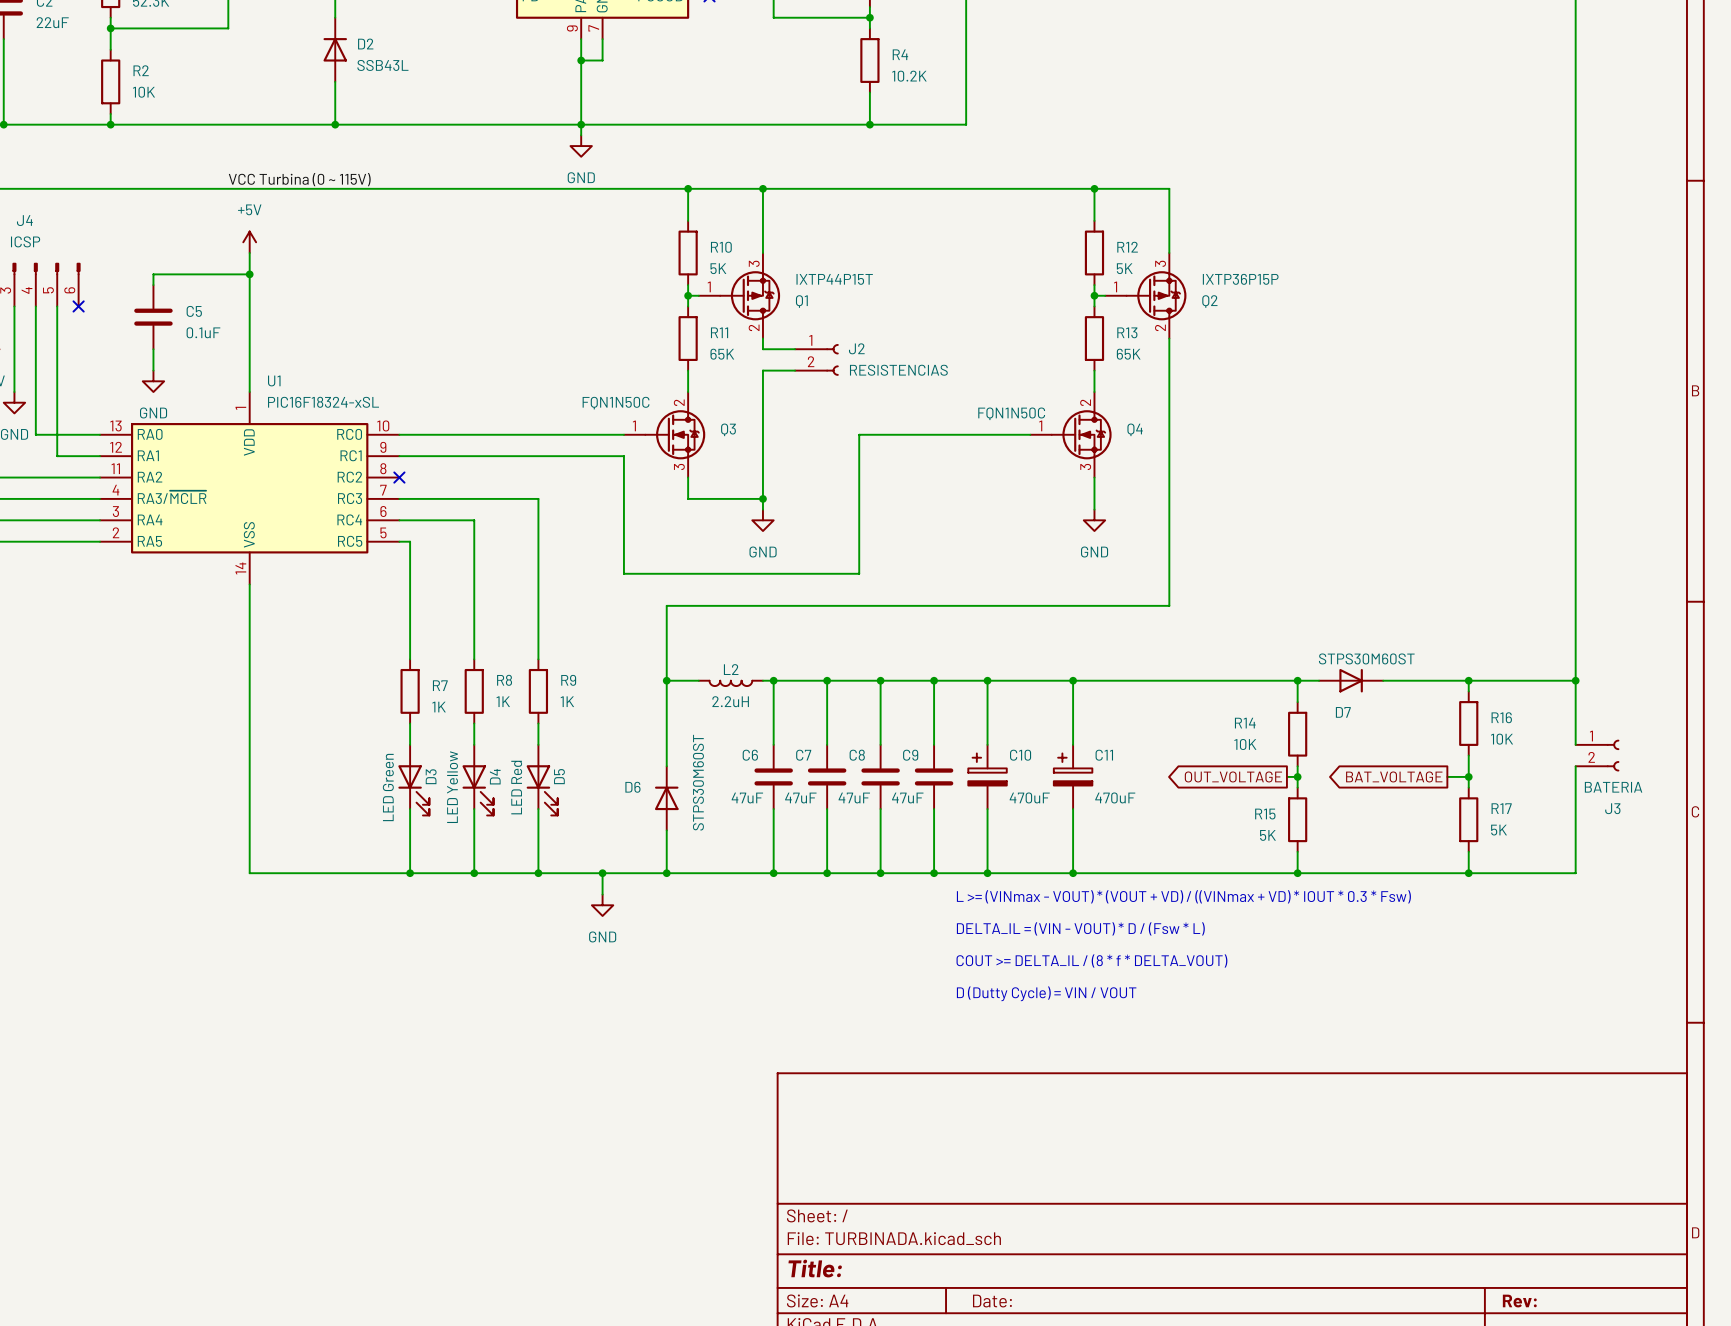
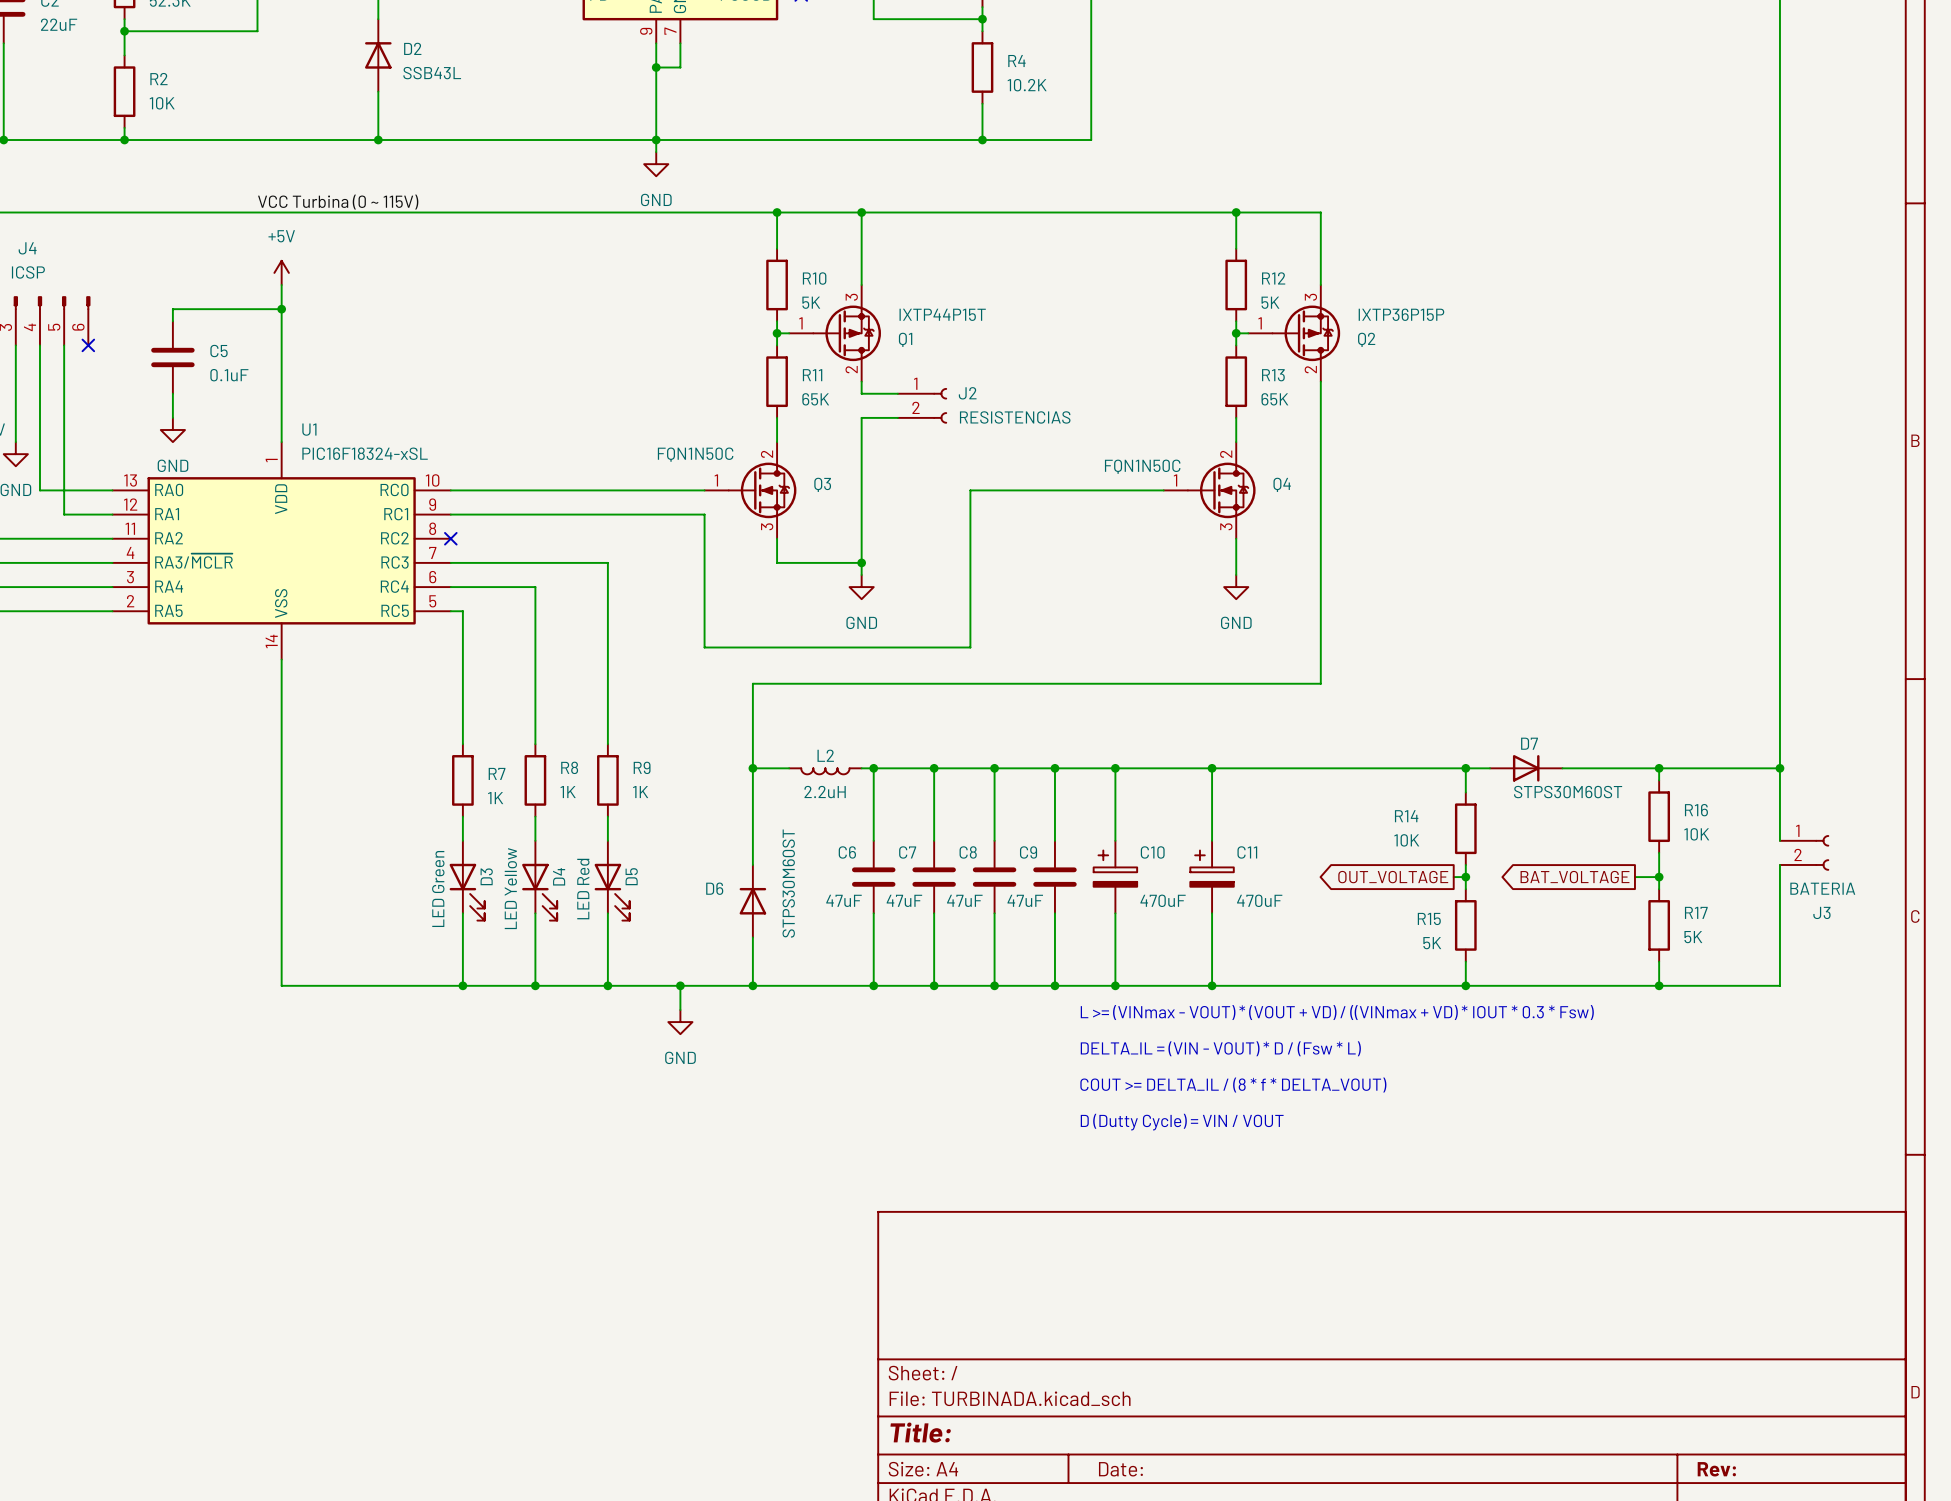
D7 value position: STPS30M60ST (1366, 658) -> STPS30M60ST (1568, 792)
D7 name position: D7 (1343, 712) -> D7 (1529, 743)

